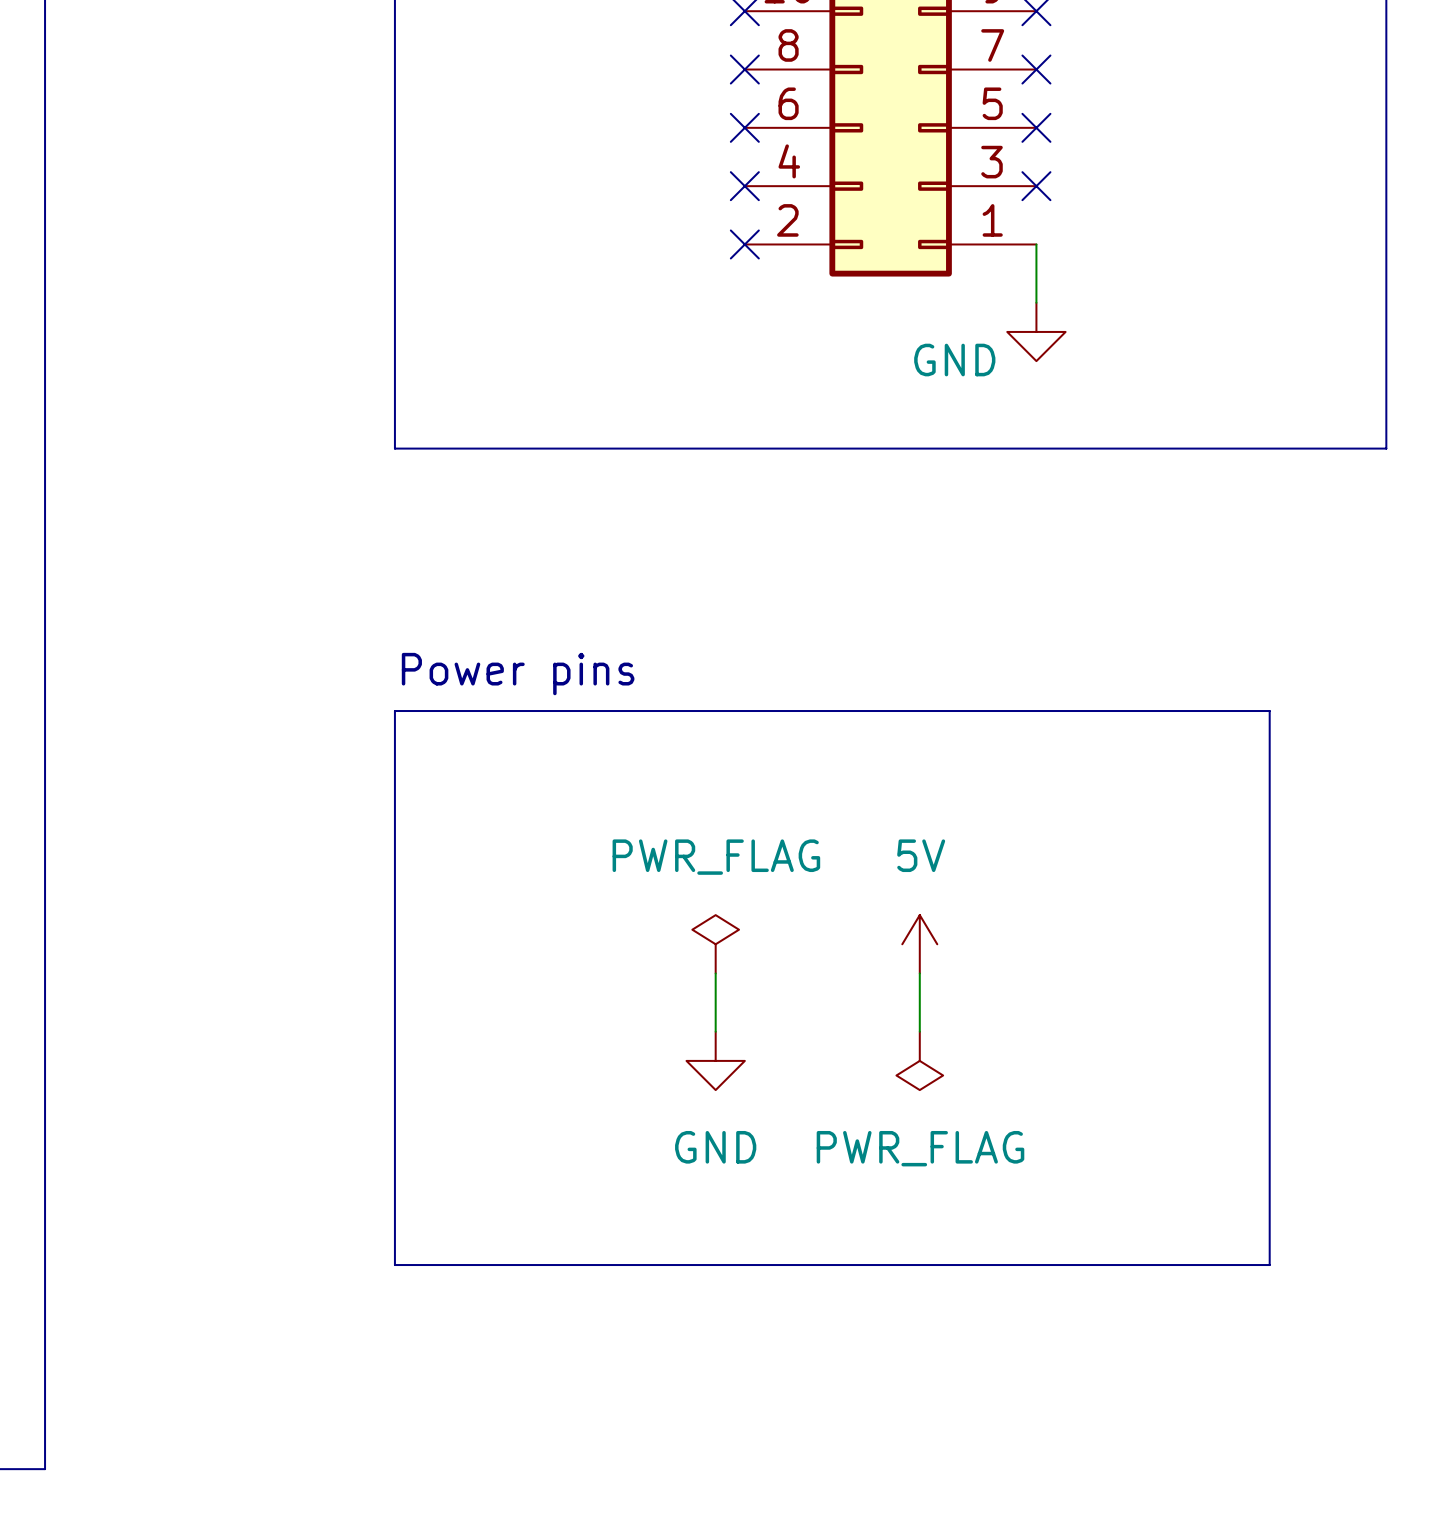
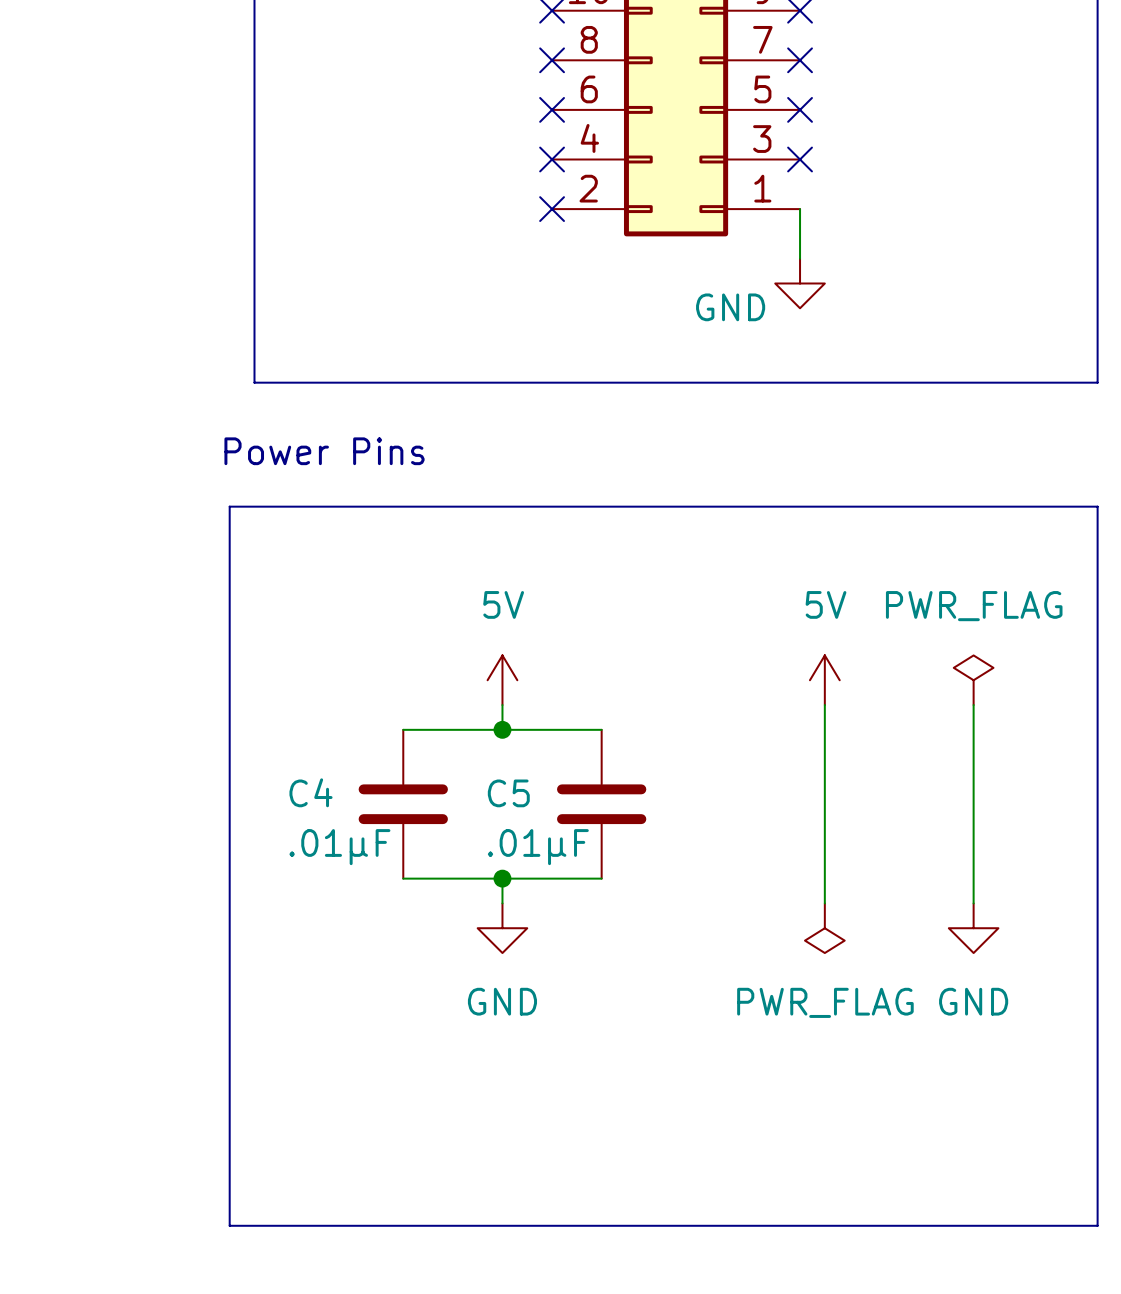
text: none -> Power Pins (324, 451)
text: Power pins (518, 674) -> none
line: (394, 711) (1269, 711) (1269, 1265) (394, 1265) (394, 711) -> (229, 506) (229, 1225) (1097, 1225) (1097, 506) (229, 506)
power symbol: none -> 5V (502, 680)
power symbol: none -> 5V (824, 680)
power symbol: none -> PWR_FLAG (973, 680)
wire: none -> (502, 705) (502, 729)
wire: none -> (824, 705) (824, 903)
wire: none -> (973, 705) (973, 903)
wire: none -> (403, 729) (601, 729)
junction: none -> (502, 729)
C4: none -> .01µF (403, 804)
power symbol: PWR_FLAG (715, 944) -> none
C5: none -> .01µF (601, 804)
power symbol: 5V (919, 944) -> none
wire: (715, 973) (715, 1031) -> none
wire: (919, 973) (919, 1031) -> none
wire: none -> (403, 878) (601, 878)
wire: none -> (502, 878) (502, 903)
junction: none -> (502, 878)
power symbol position: GND (715, 1060) -> GND (502, 928)
power symbol position: PWR_FLAG (919, 1060) -> PWR_FLAG (824, 928)
power symbol: none -> GND (973, 928)

